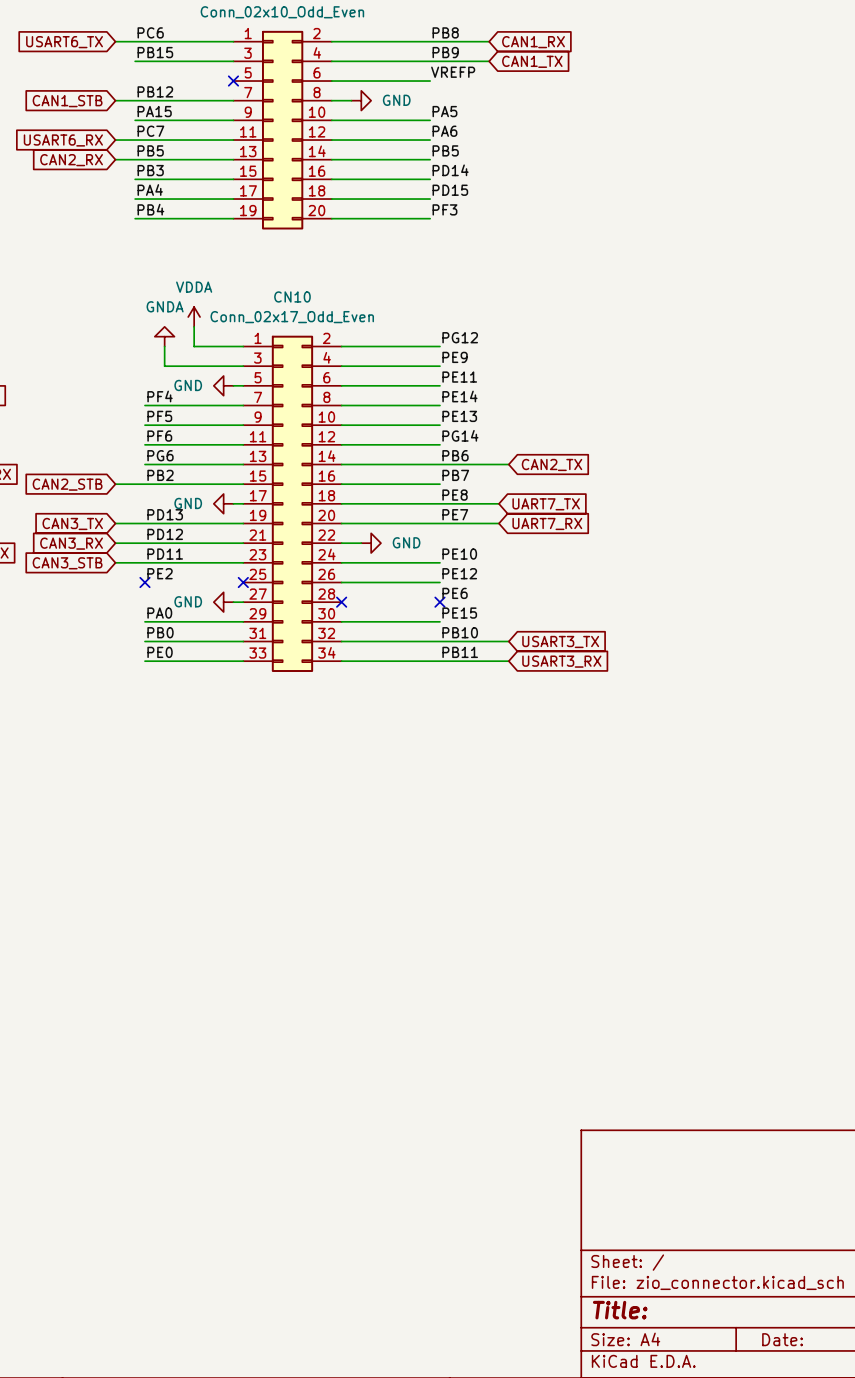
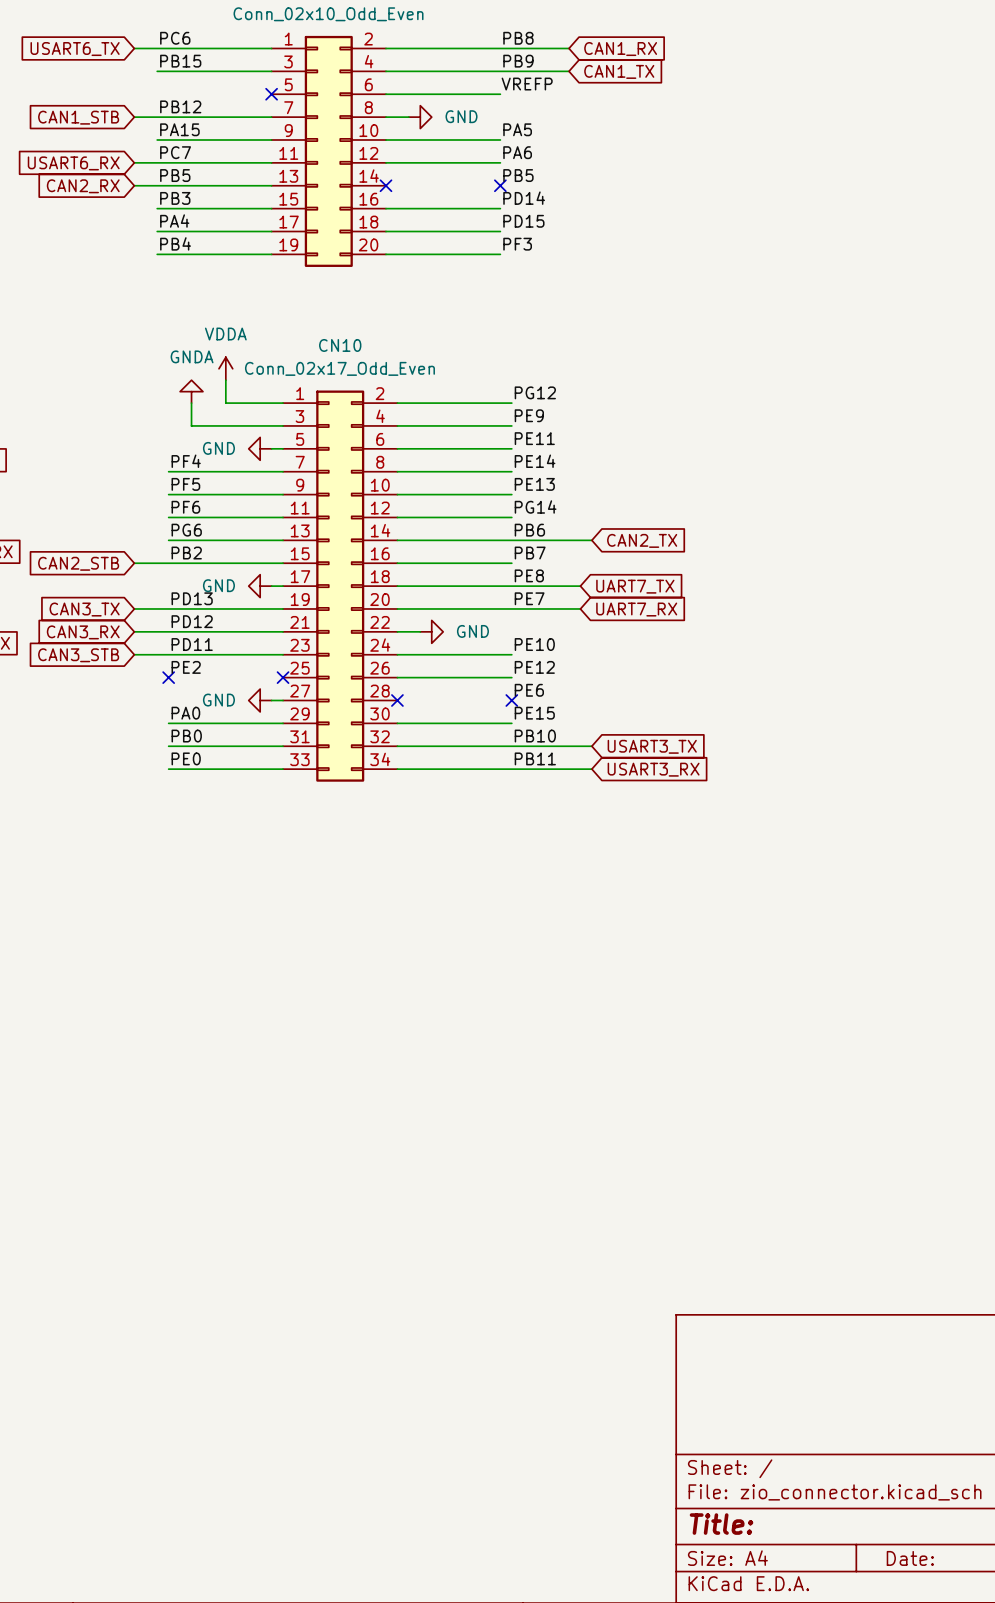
wire: (331, 159) (430, 159) -> none
no-connect mark: none -> (385, 185)
no-connect mark: none -> (500, 185)

